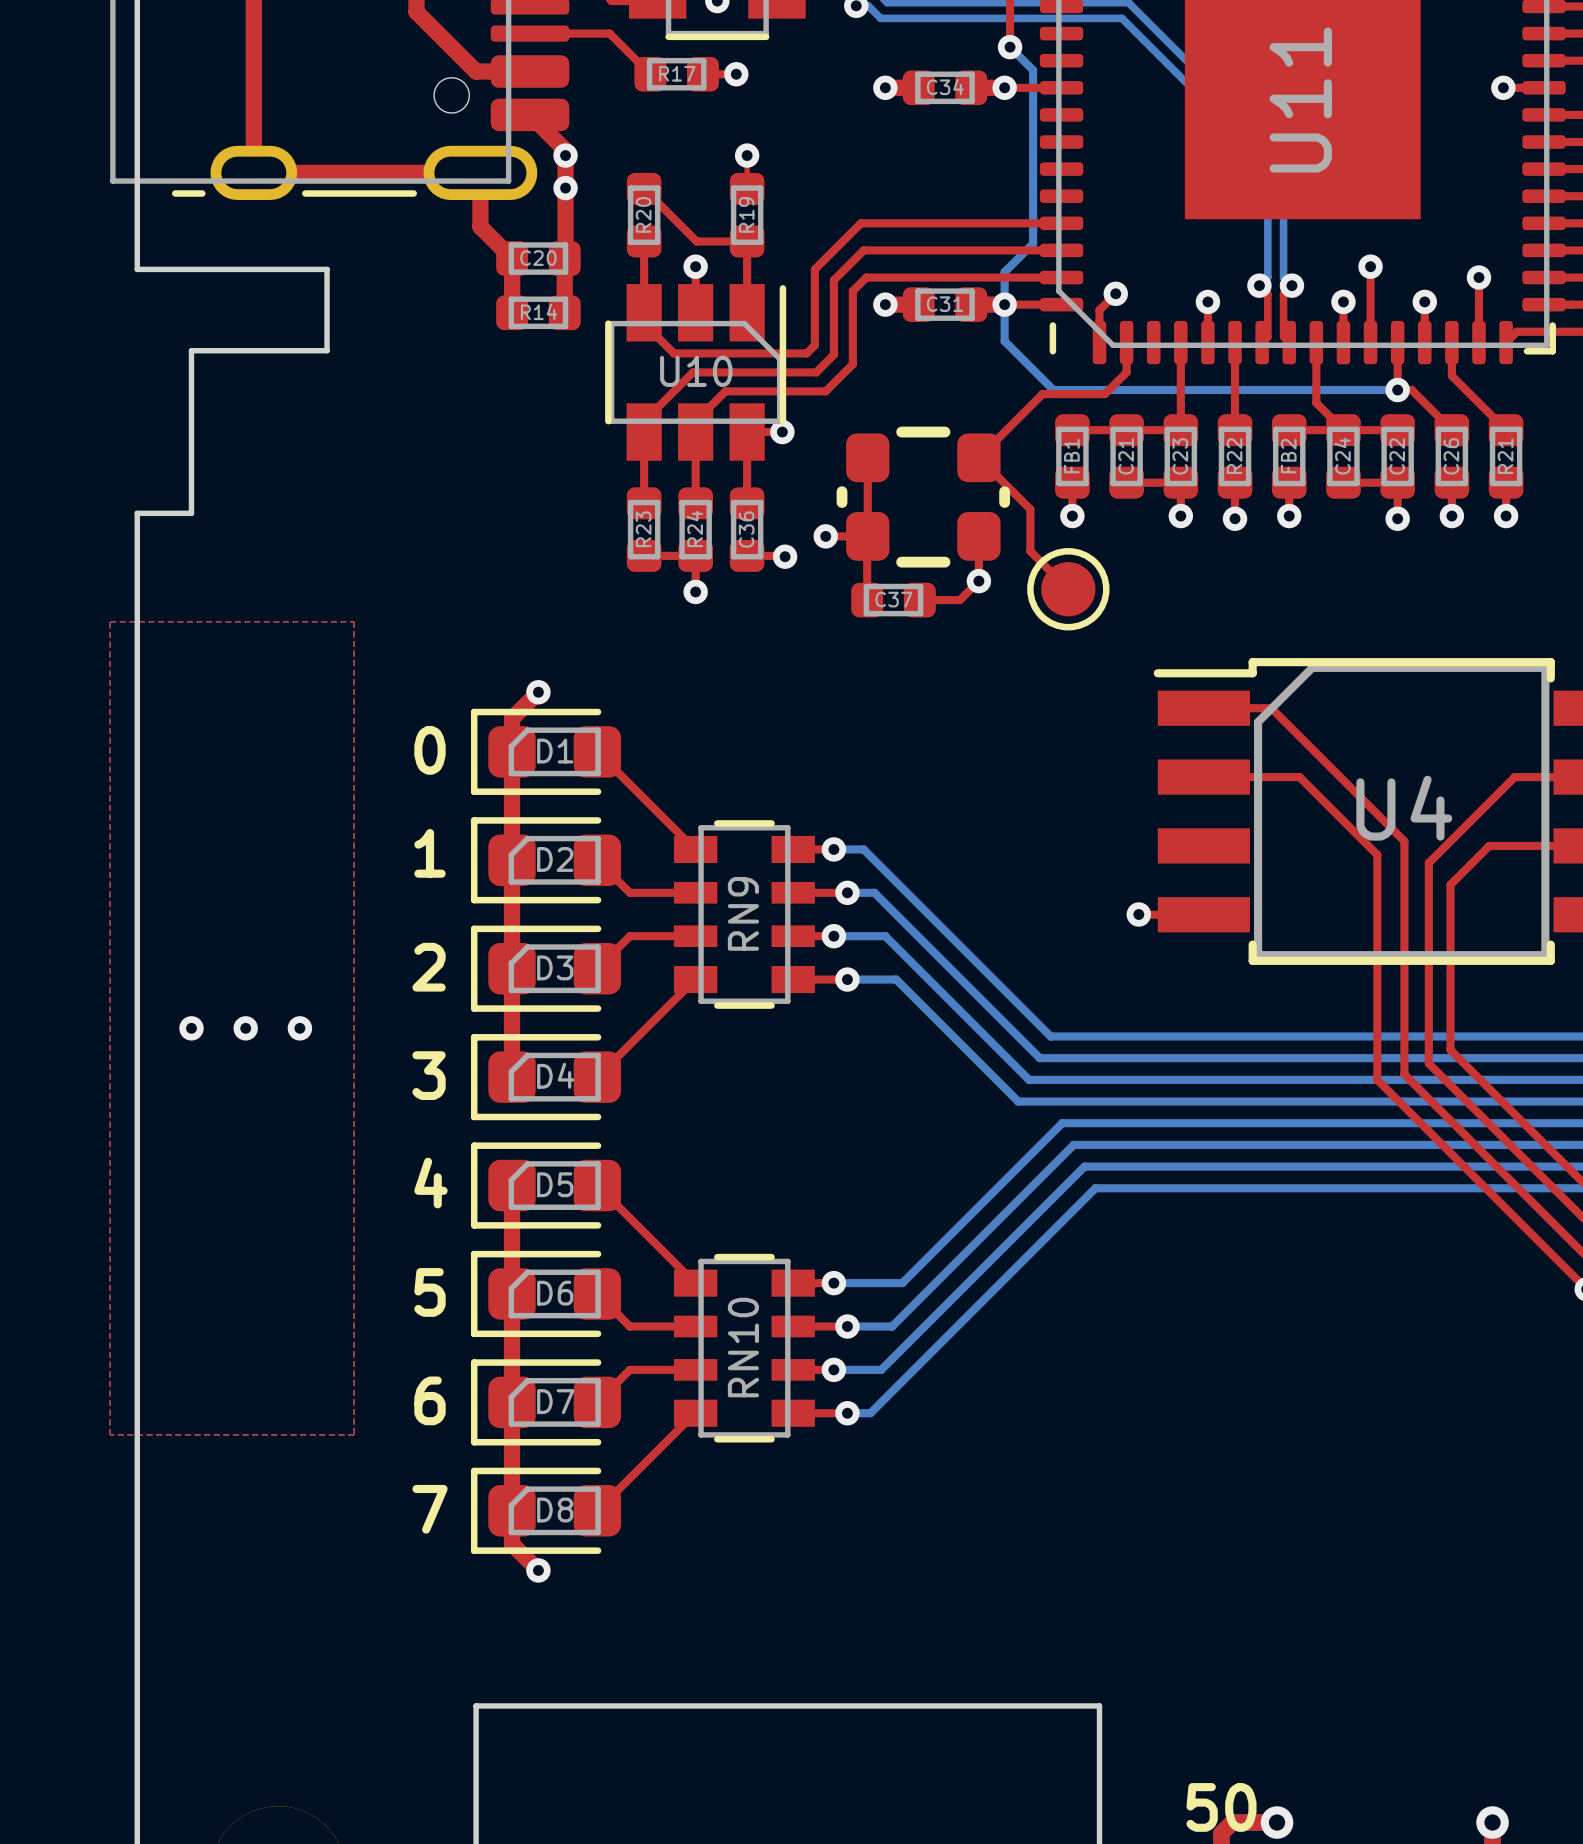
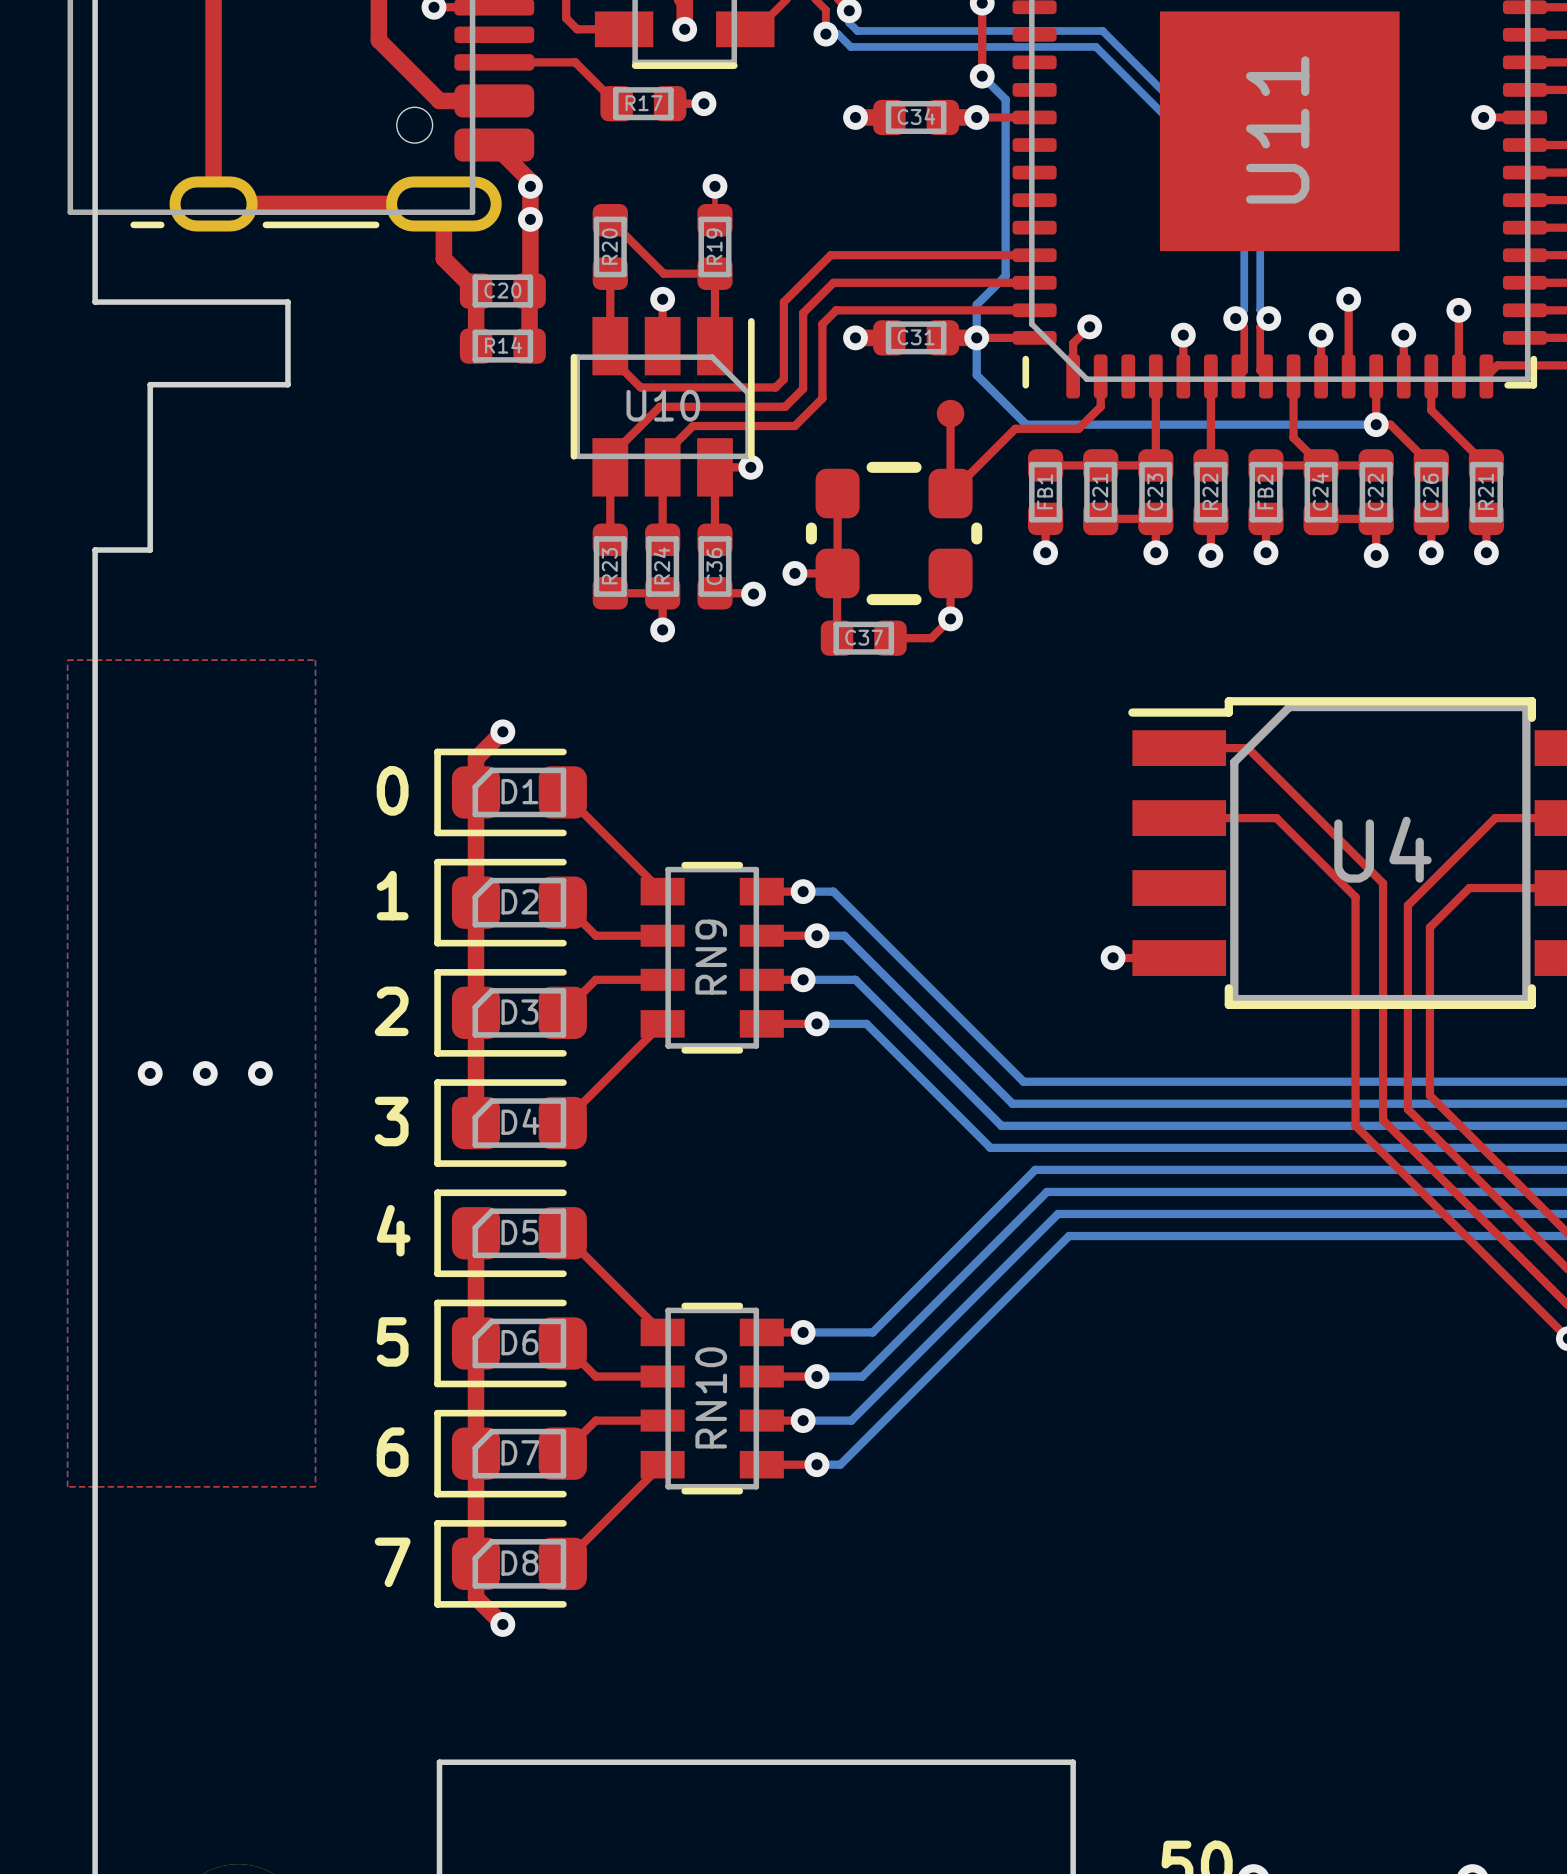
part: none -> (950, 413)
top track: (978, 457) (1030, 509) (1030, 551) (1068, 589) -> (950, 493) (950, 413)
part: (1068, 589) -> none

